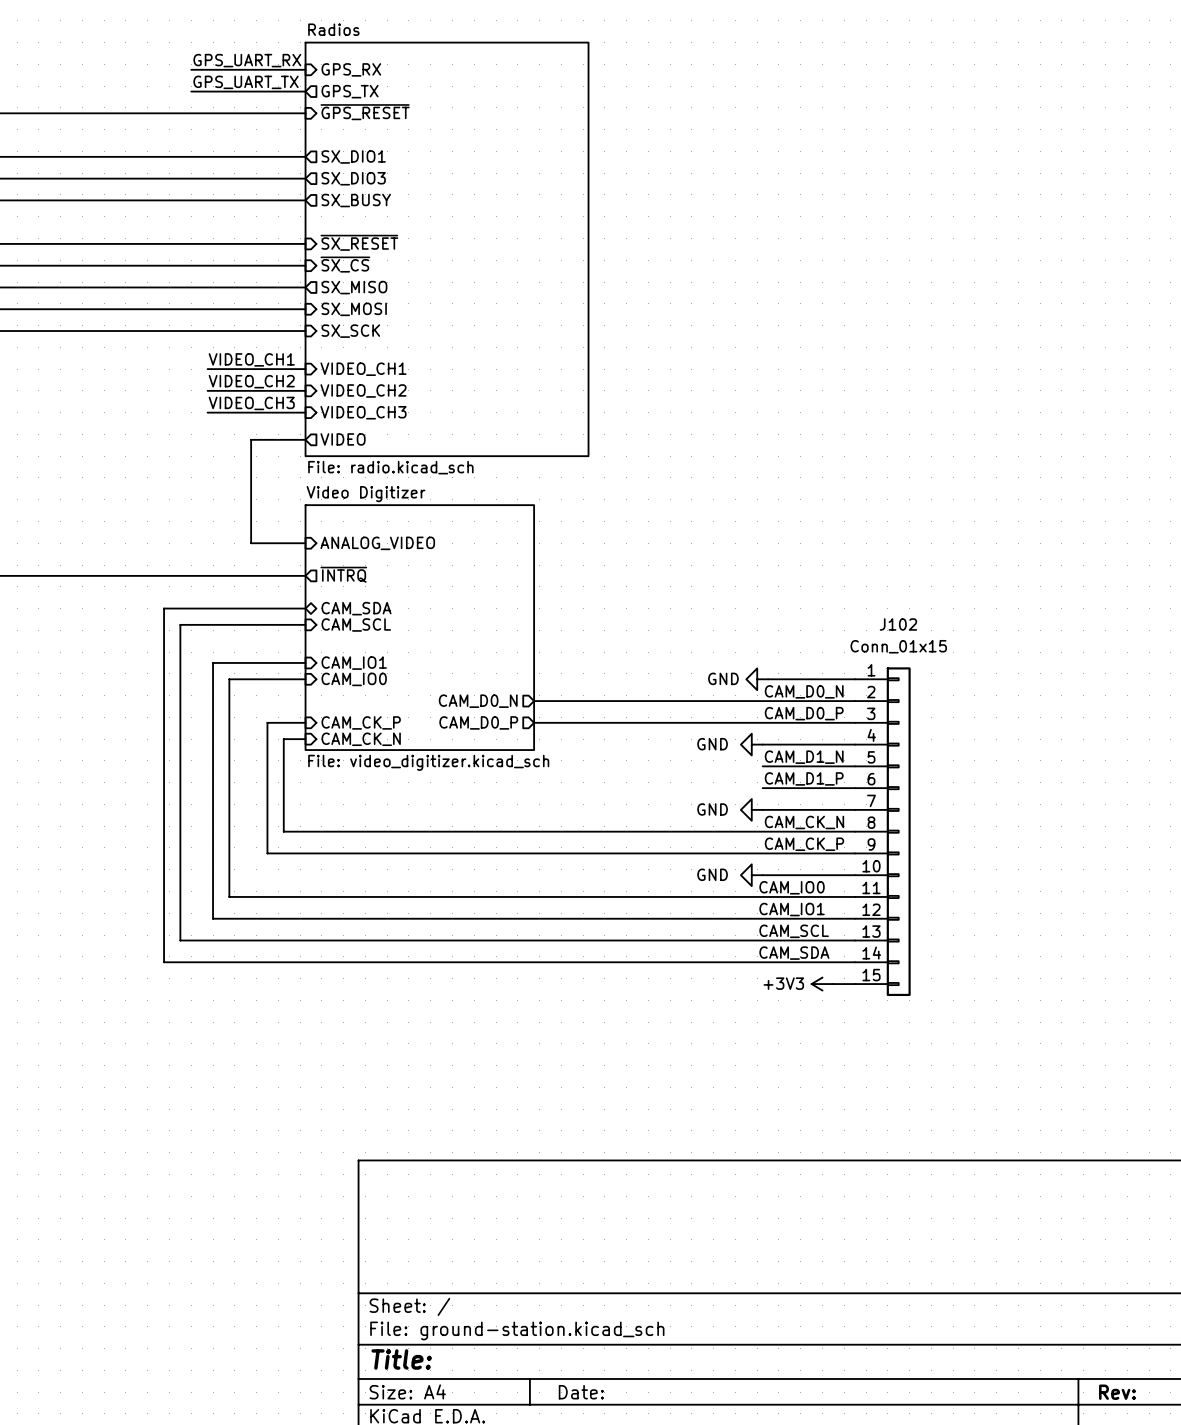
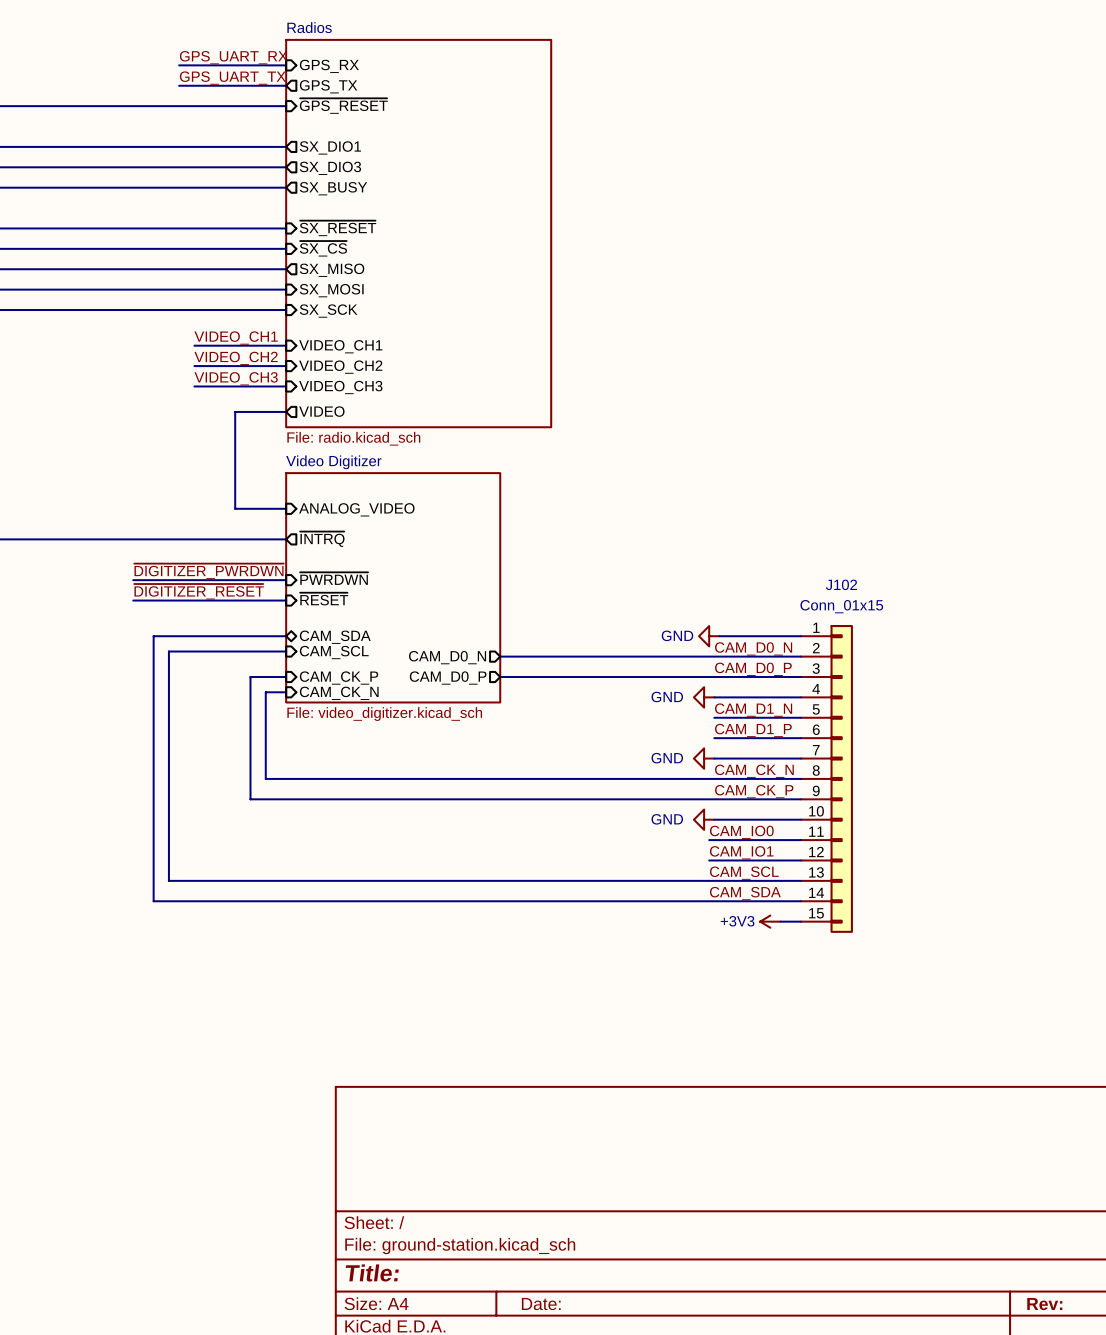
label: none -> ~{DIGITIZER_PWRDWN} (208, 571)
wire: (305, 608) (164, 608) (164, 679) -> (214, 636) (153, 636)
sheet pin: CAM_SDA (356, 608) -> none
sheet pin: none -> ~{PWRDWN} (334, 578)
wire: none -> (133, 580) (286, 580)
wire: (305, 624) (180, 624) (180, 695) -> (286, 651) (168, 651)
sheet pin position: CAM_SCL (356, 624) -> CAM_SCL (334, 652)
label: none -> ~{DIGITIZER_RESET} (199, 591)
sheet pin: none -> ~{RESET} (324, 599)
wire: none -> (133, 600) (286, 600)
wire: (305, 662) (213, 662) (213, 918) (757, 918) -> none
sheet pin: CAM_IO1 (354, 663) -> none
wire: (229, 679) (229, 896) (757, 896) -> none
sheet pin shape: input (354, 679) -> bidirectional (335, 637)
sheet pin: CAM_IO0 (354, 679) -> CAM_SDA (335, 637)

